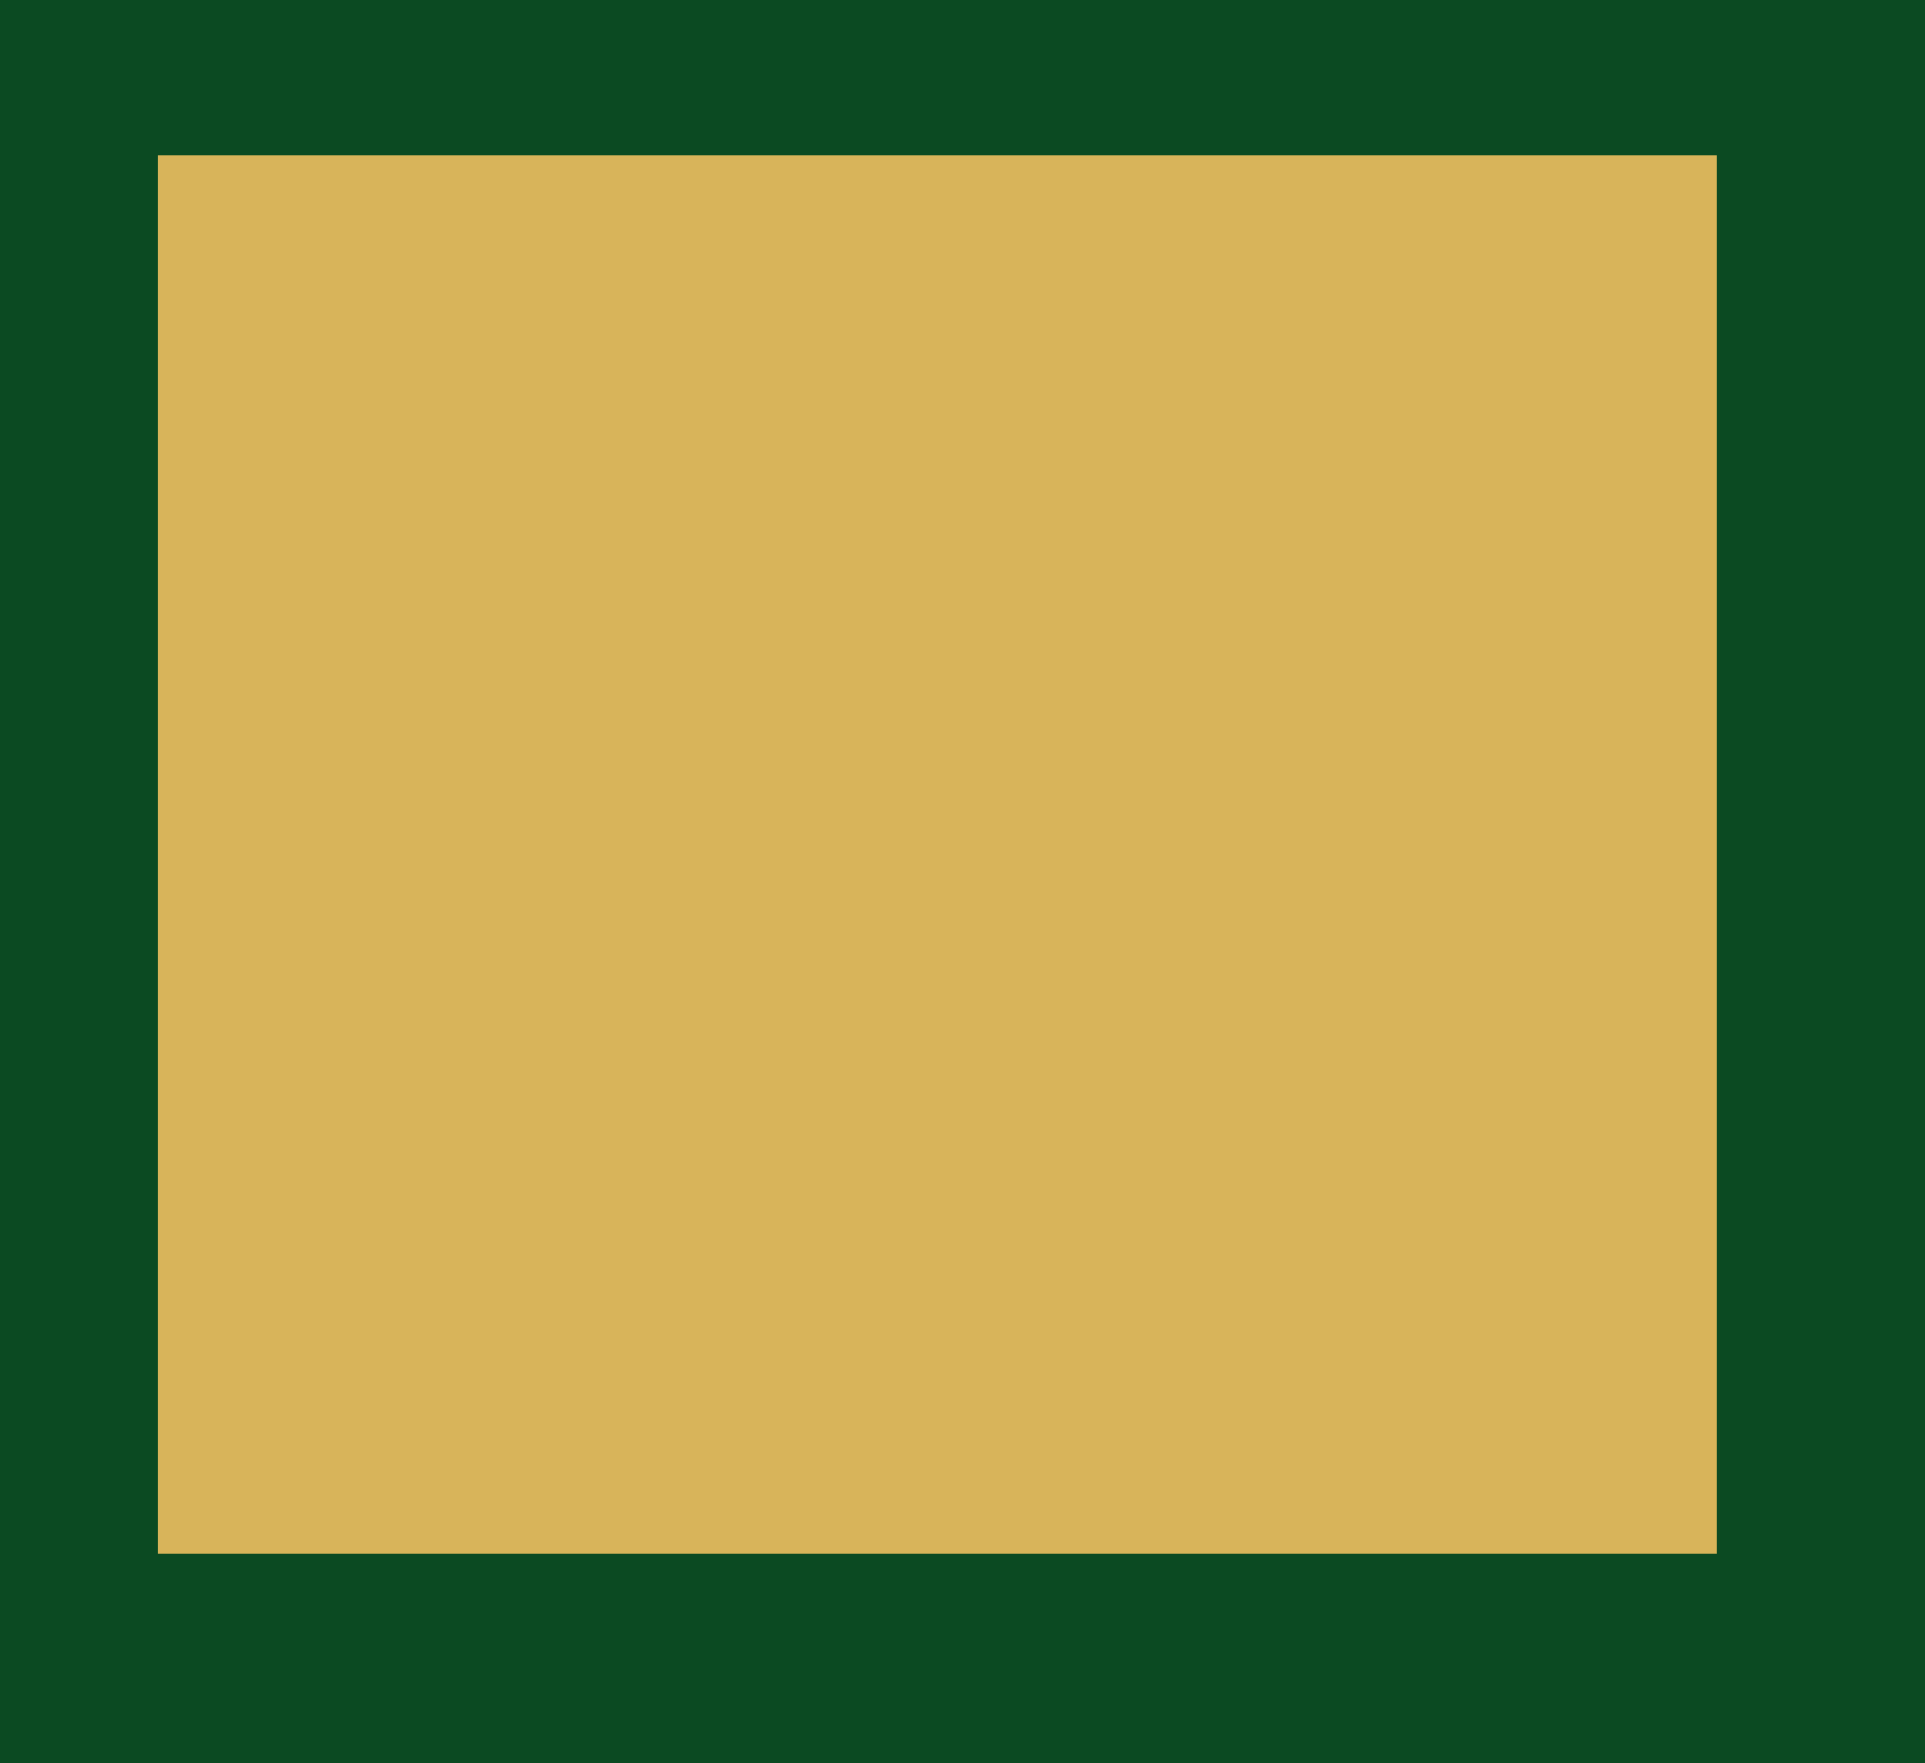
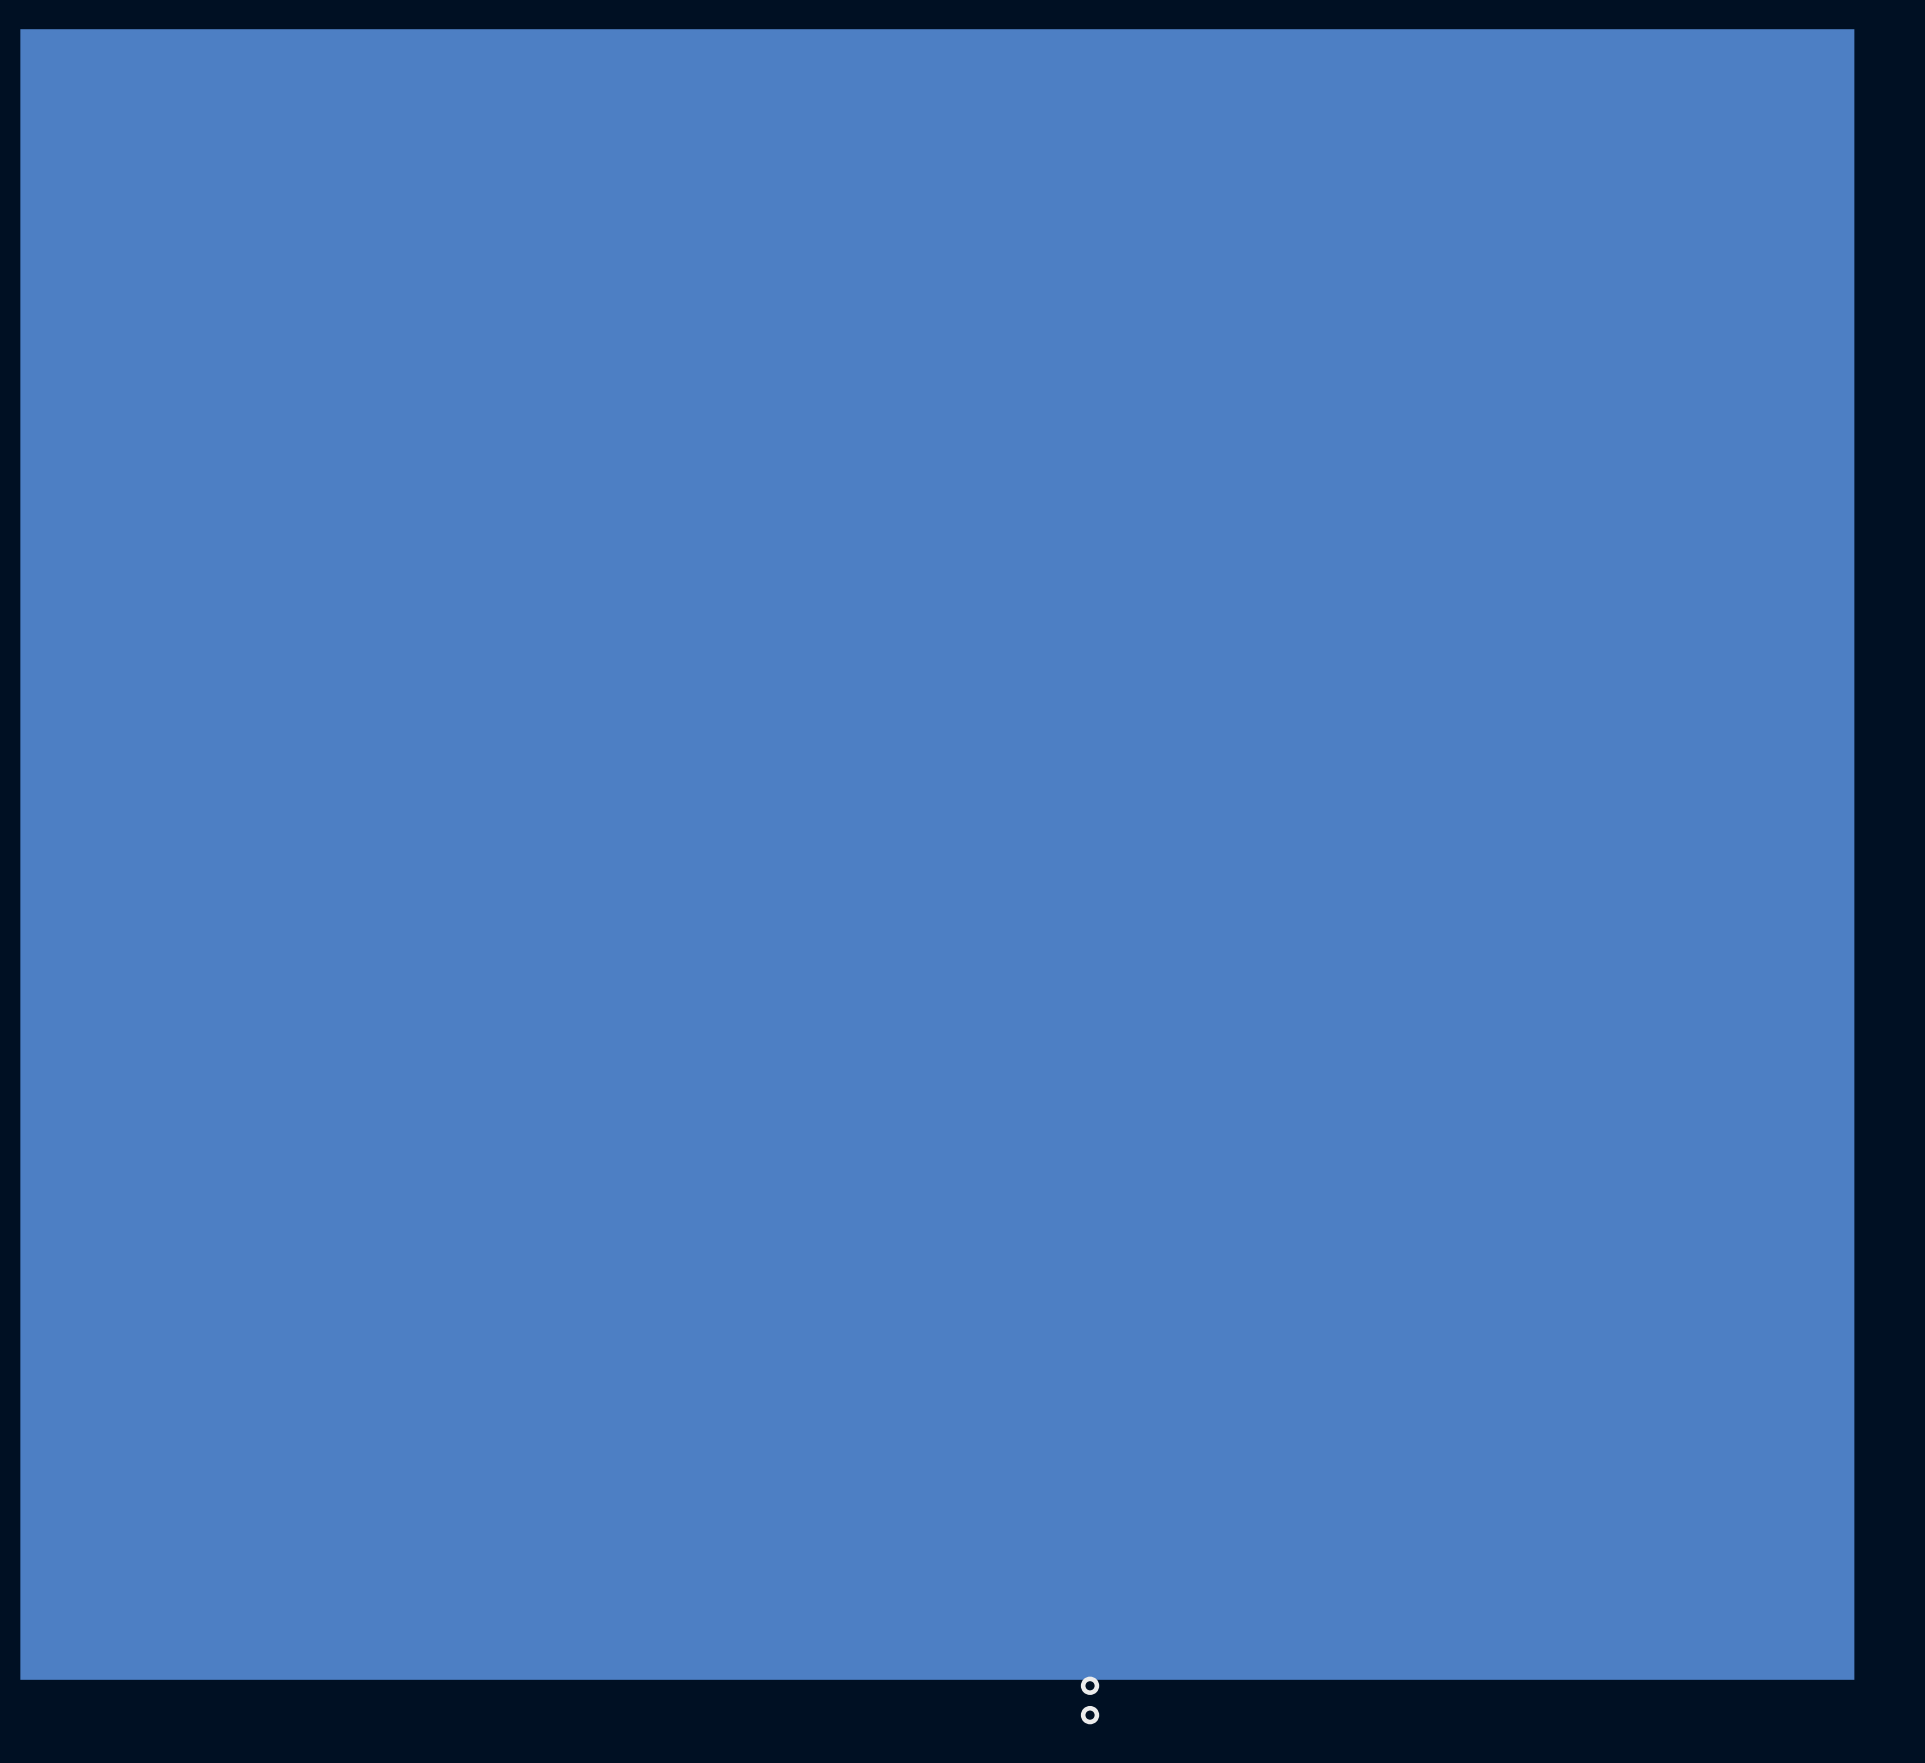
part footprint: [157, 155, 1717, 1554] -> [20, 29, 1855, 1680]
via: none -> (1090, 1685)
via: none -> (1090, 1715)

